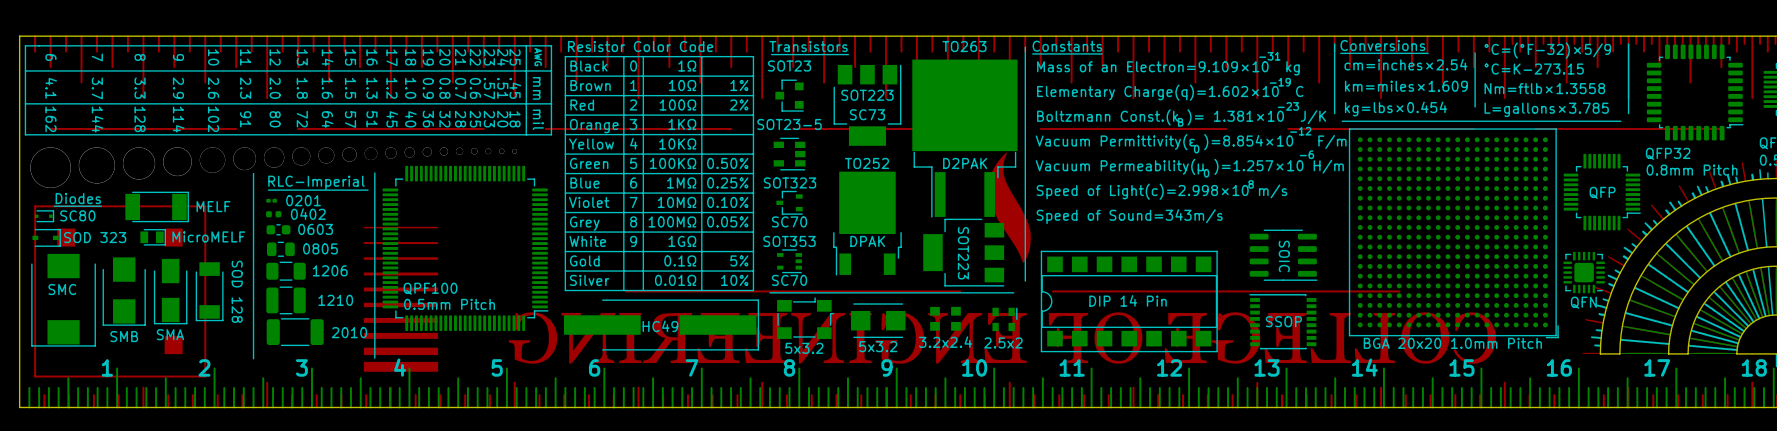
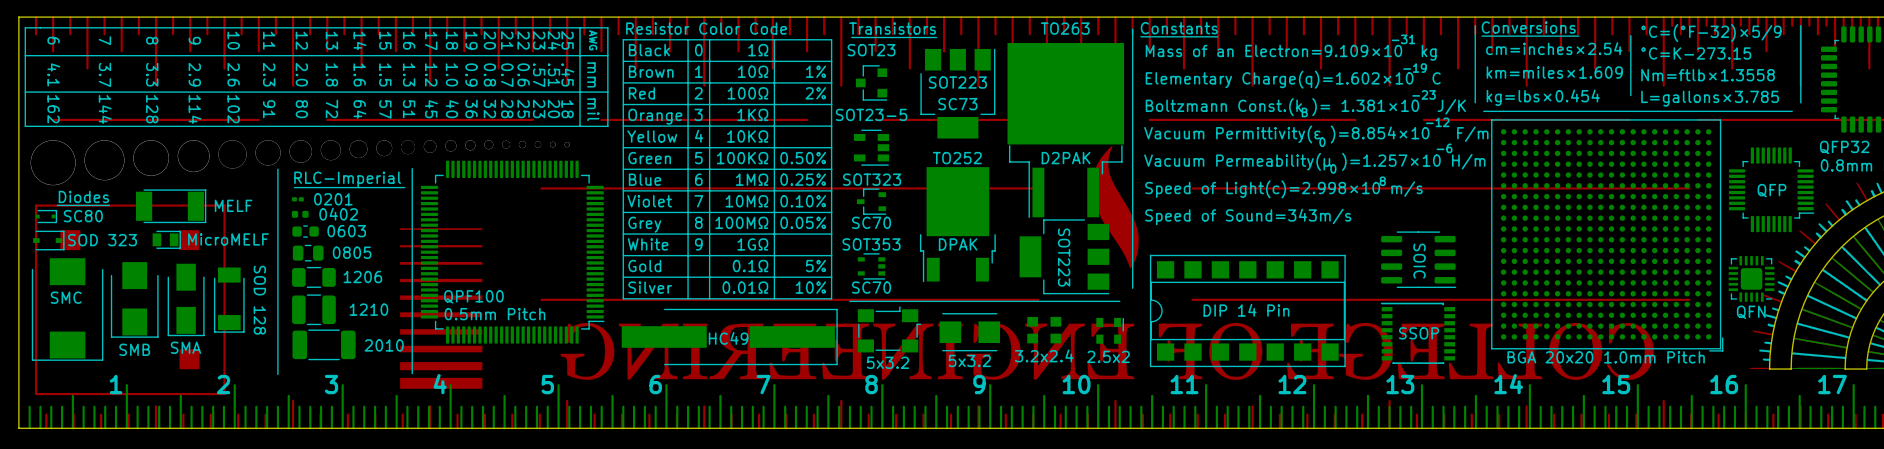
top track: none -> (1038, 188) (541, 188)
top track: none -> (1689, 188) (1192, 188)
top track: none -> (690, 299) (541, 299)
top track: (960, 291) (940, 291) -> none
top track: (1079, 291) (1053, 291) -> none
top track: none -> (1689, 299) (1547, 299)

